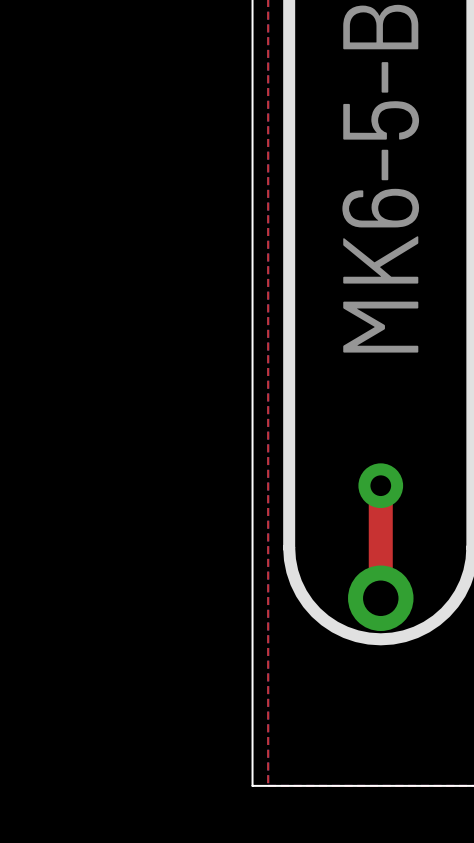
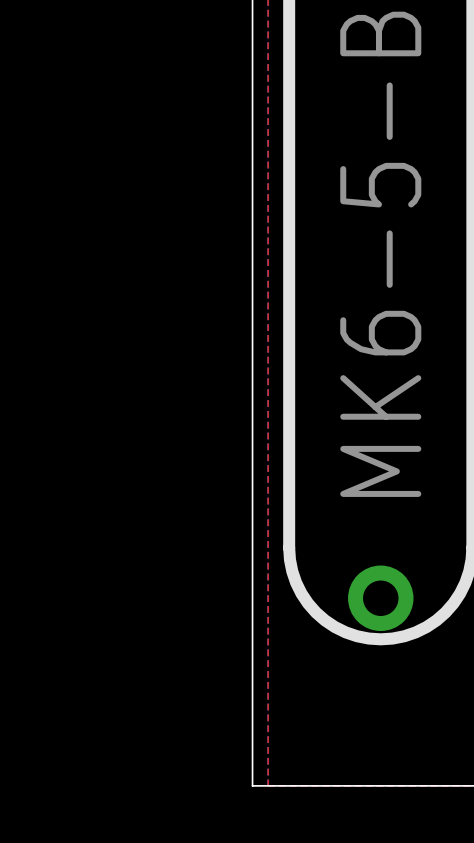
top track: (380, 485) (380, 598) -> none
via: (380, 485) -> none

